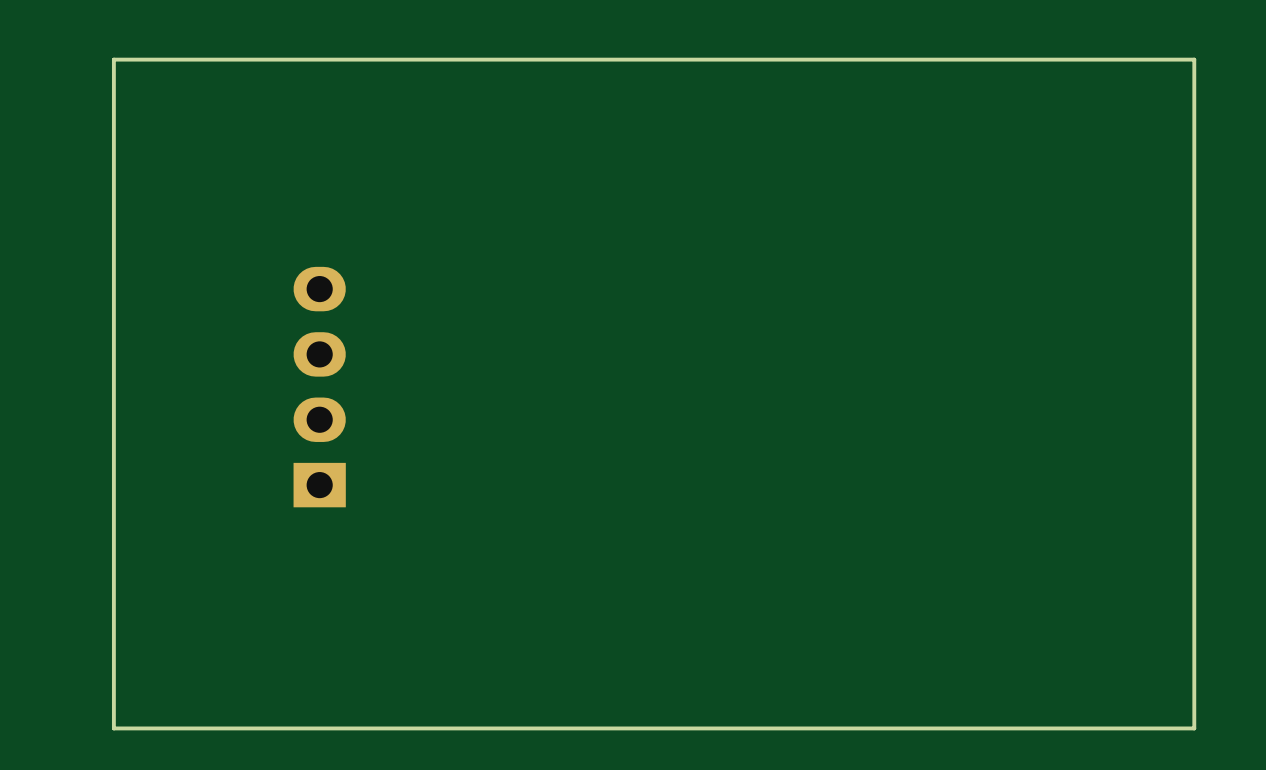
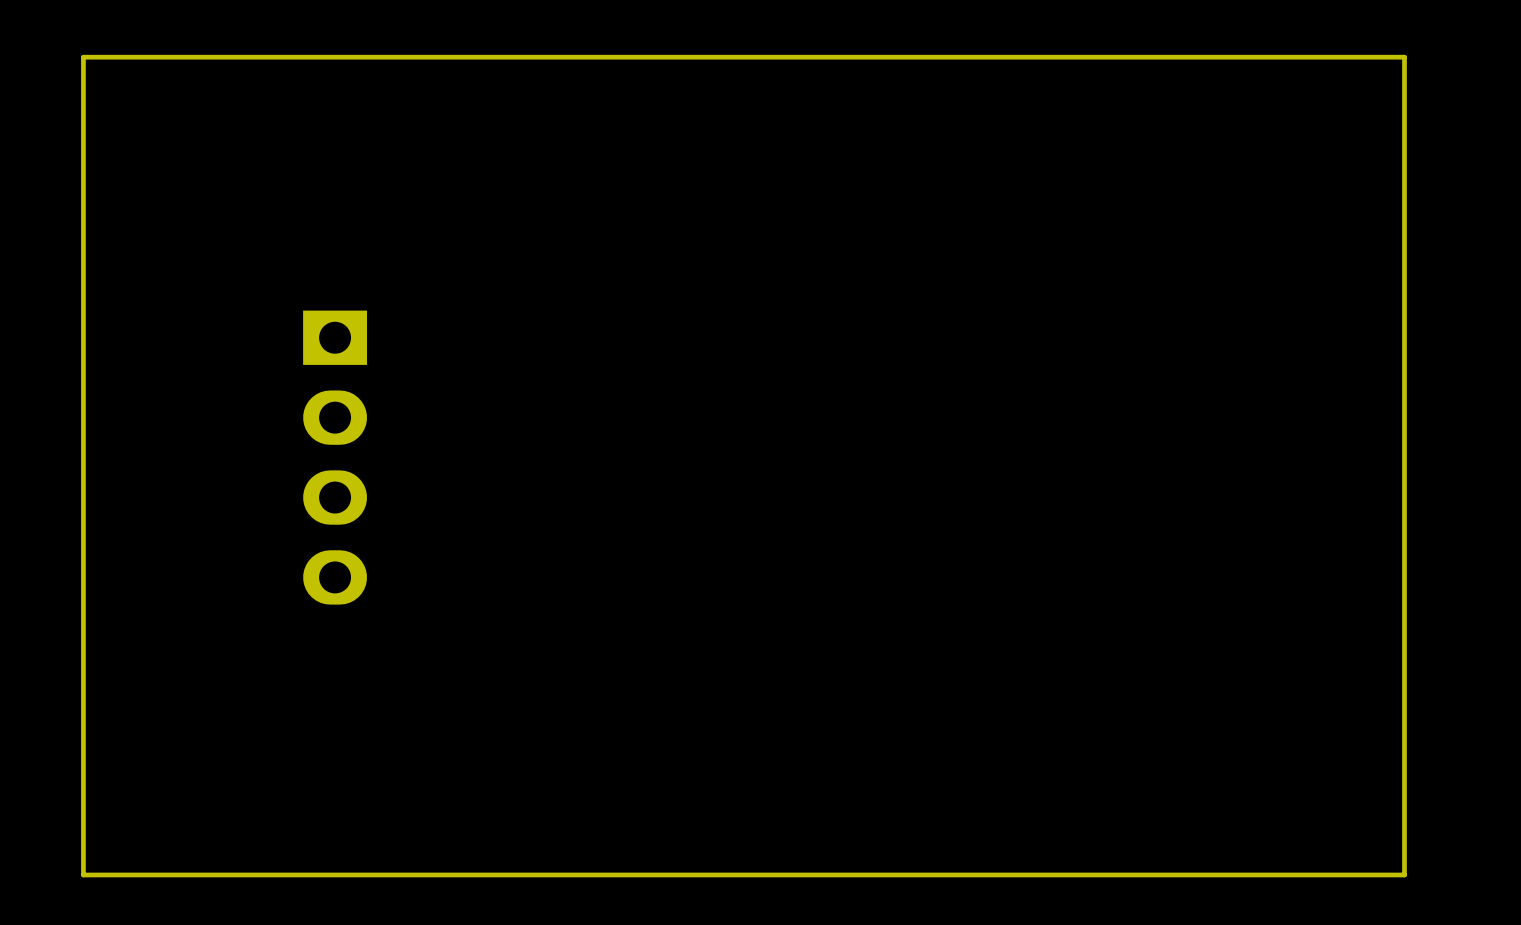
part rotation: 0° (319, 387) -> 180° (335, 457)

